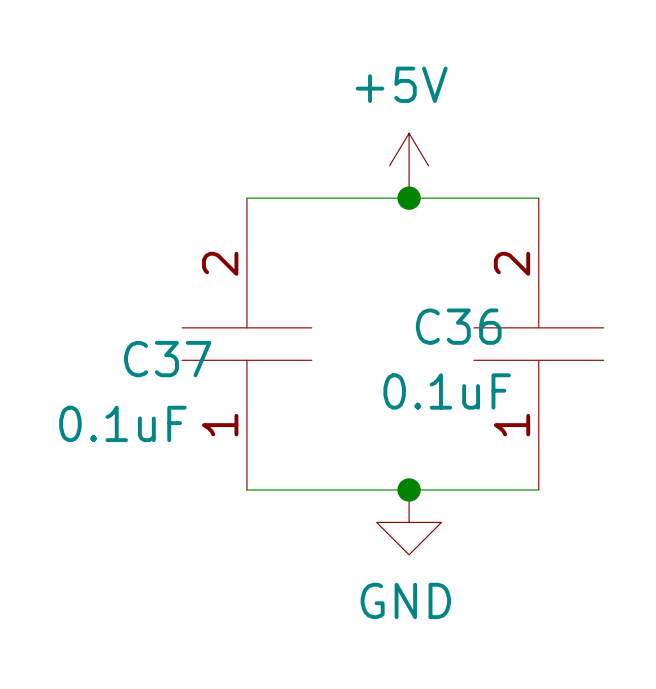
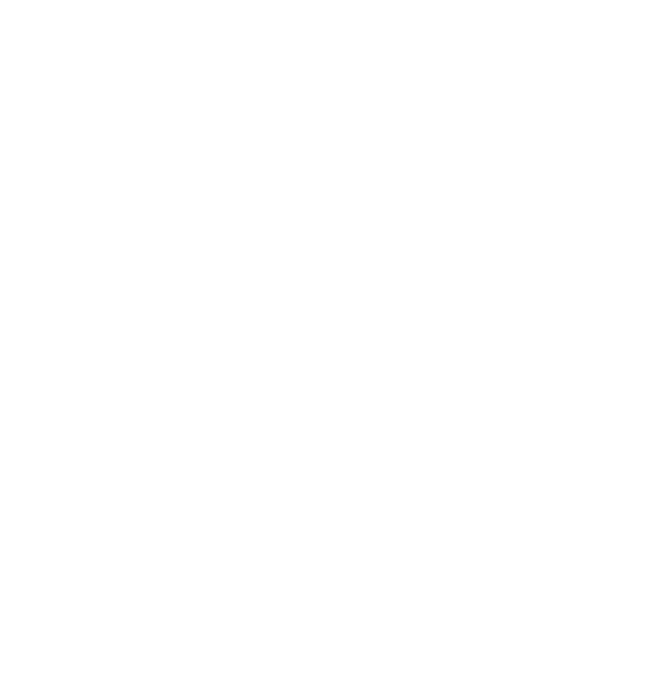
power symbol: +5V (409, 165) -> none
wire: (246, 198) (538, 198) -> none
junction: (409, 198) -> none
C37: (246, 344) -> none
C36: (538, 344) -> none
wire: (246, 489) (538, 489) -> none
junction: (409, 489) -> none
power symbol: GND (409, 522) -> none

